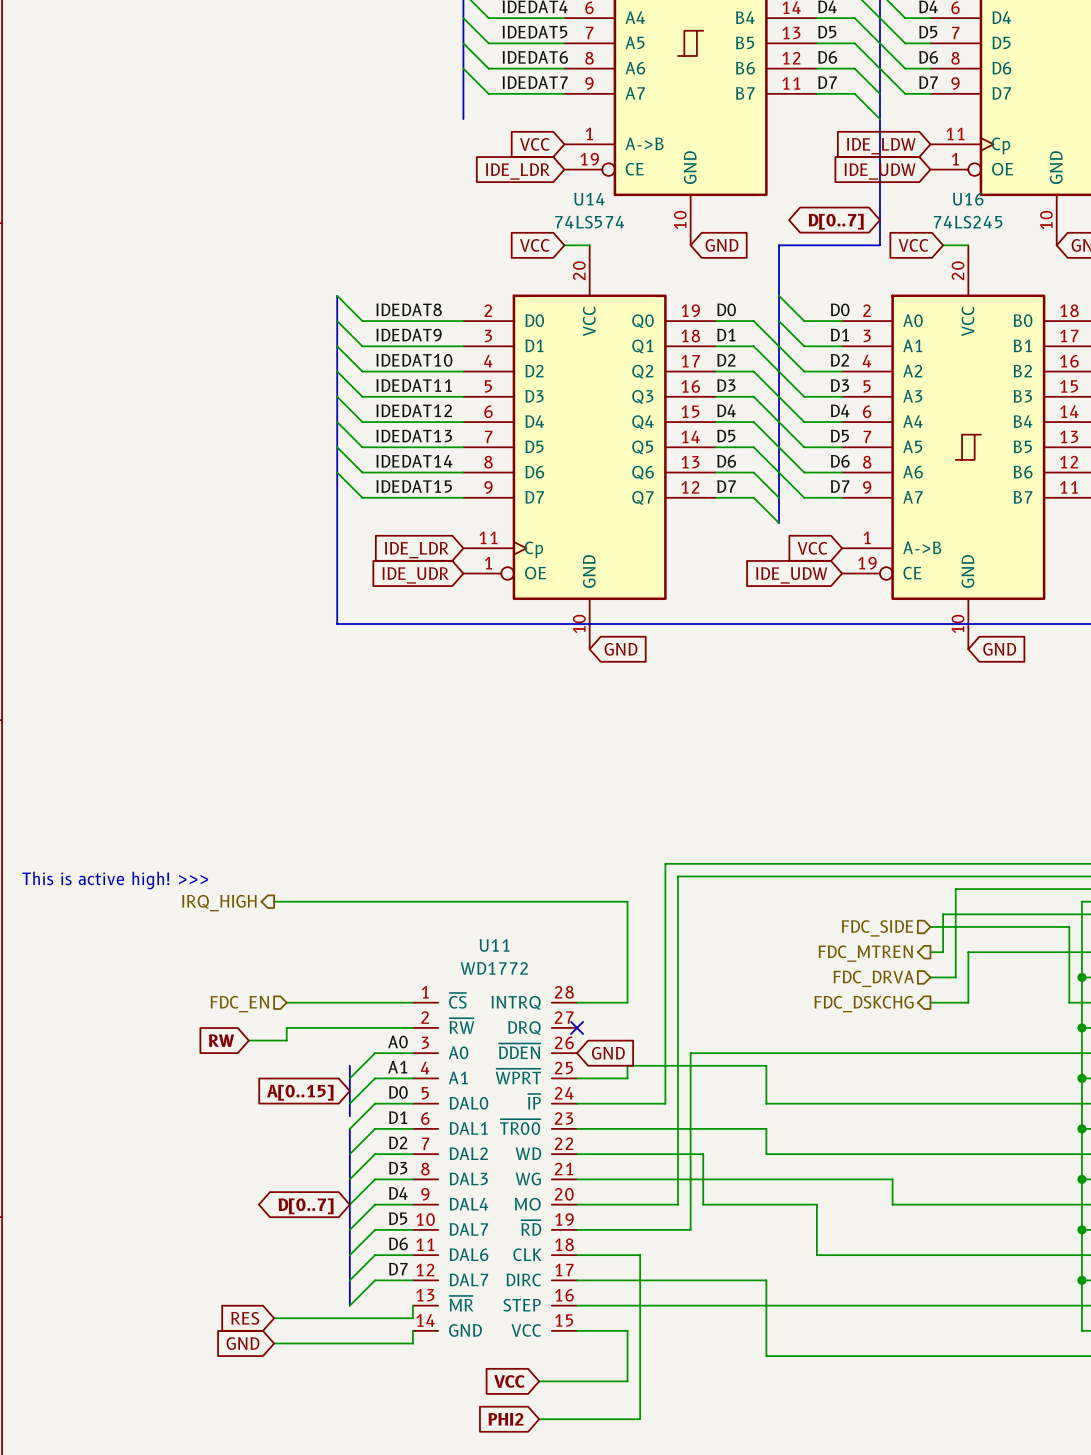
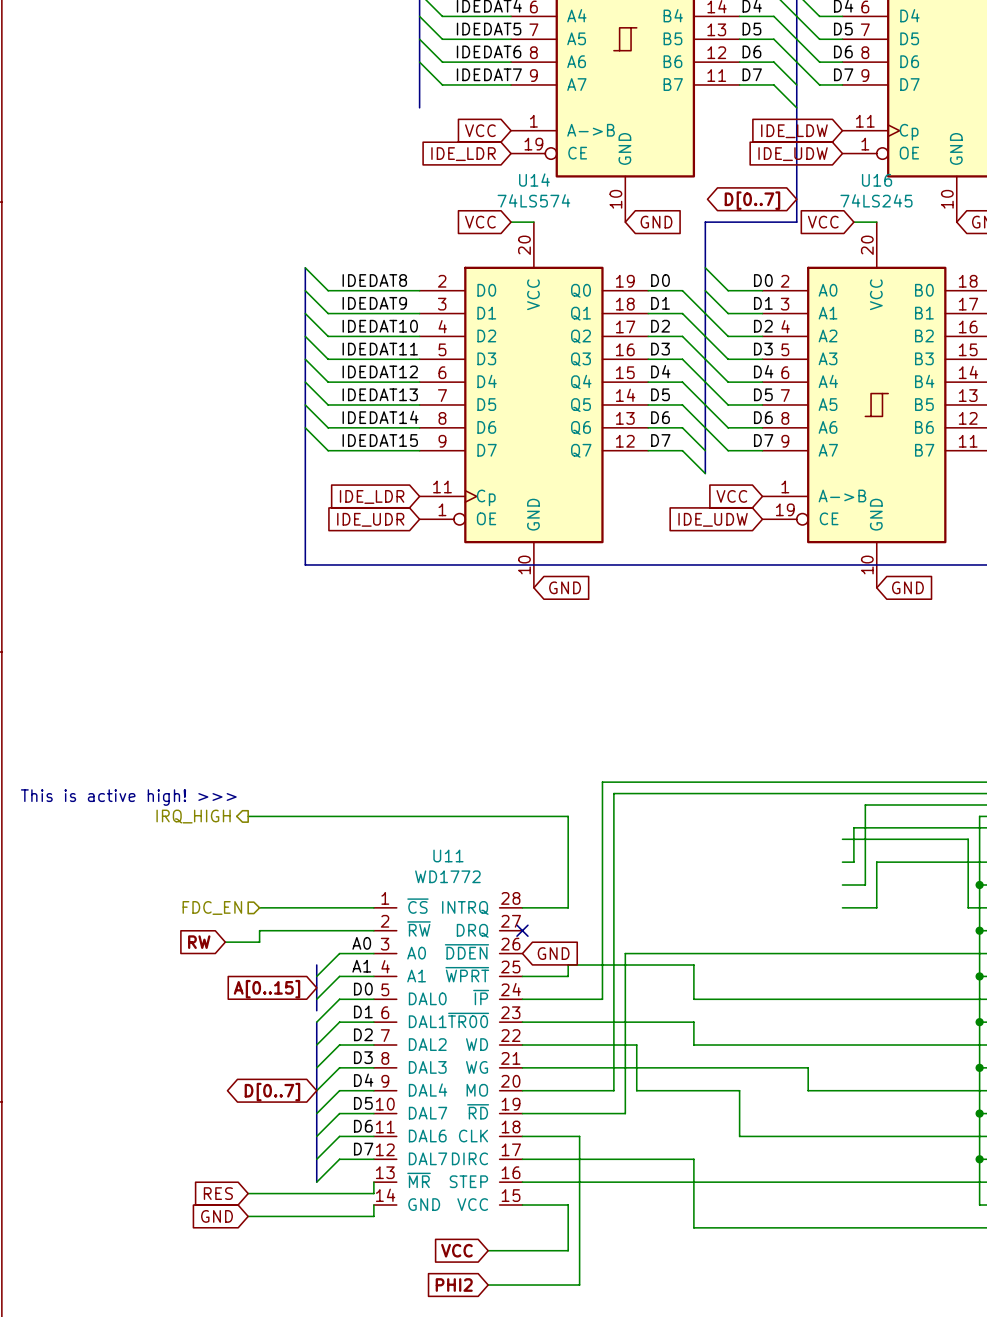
hierarchical label: FDC_SIDE (877, 928) -> none
hierarchical label: FDC_MTREN (865, 953) -> none
hierarchical label: FDC_DRVA (873, 978) -> none
hierarchical label: FDC_DSKCHG (864, 1004) -> none

